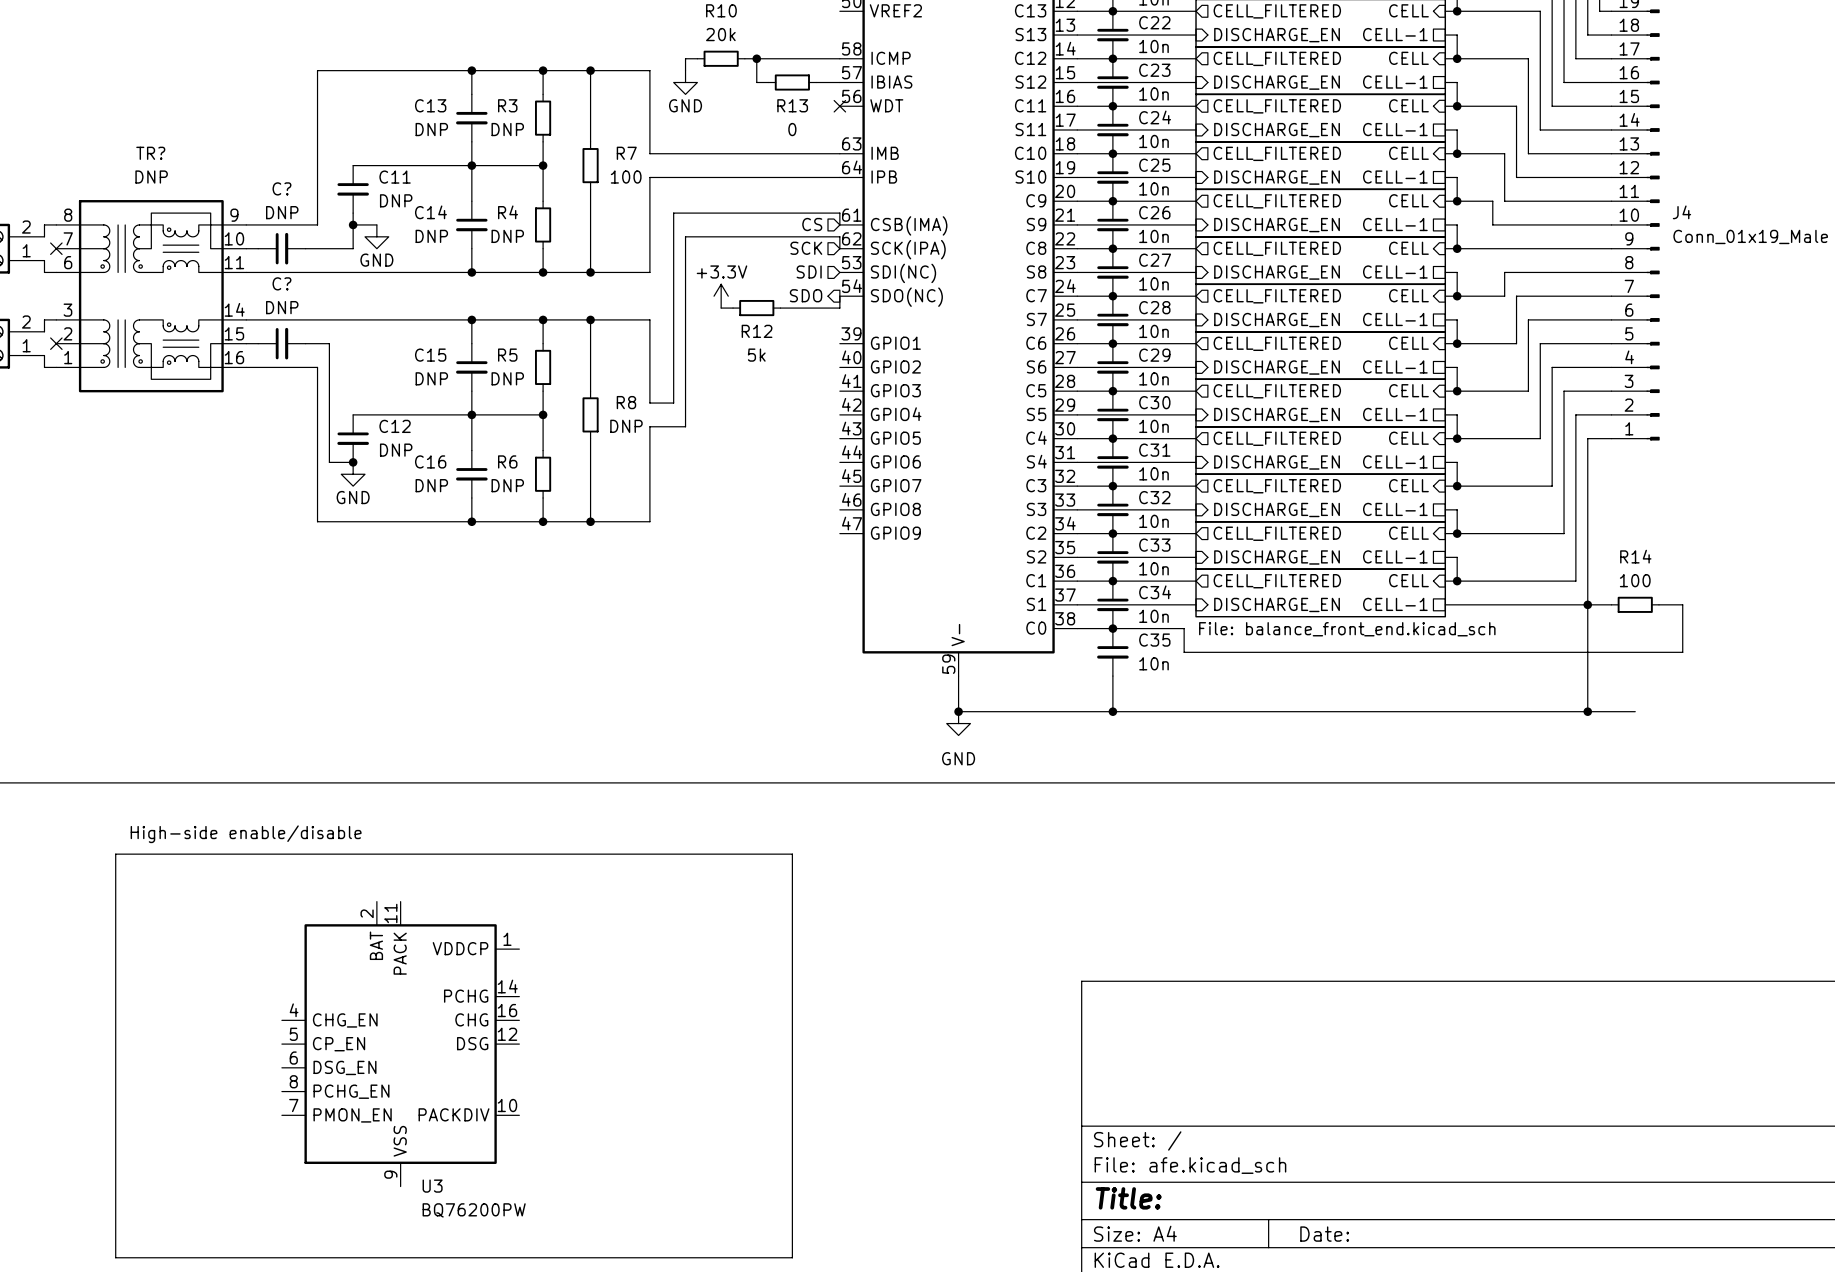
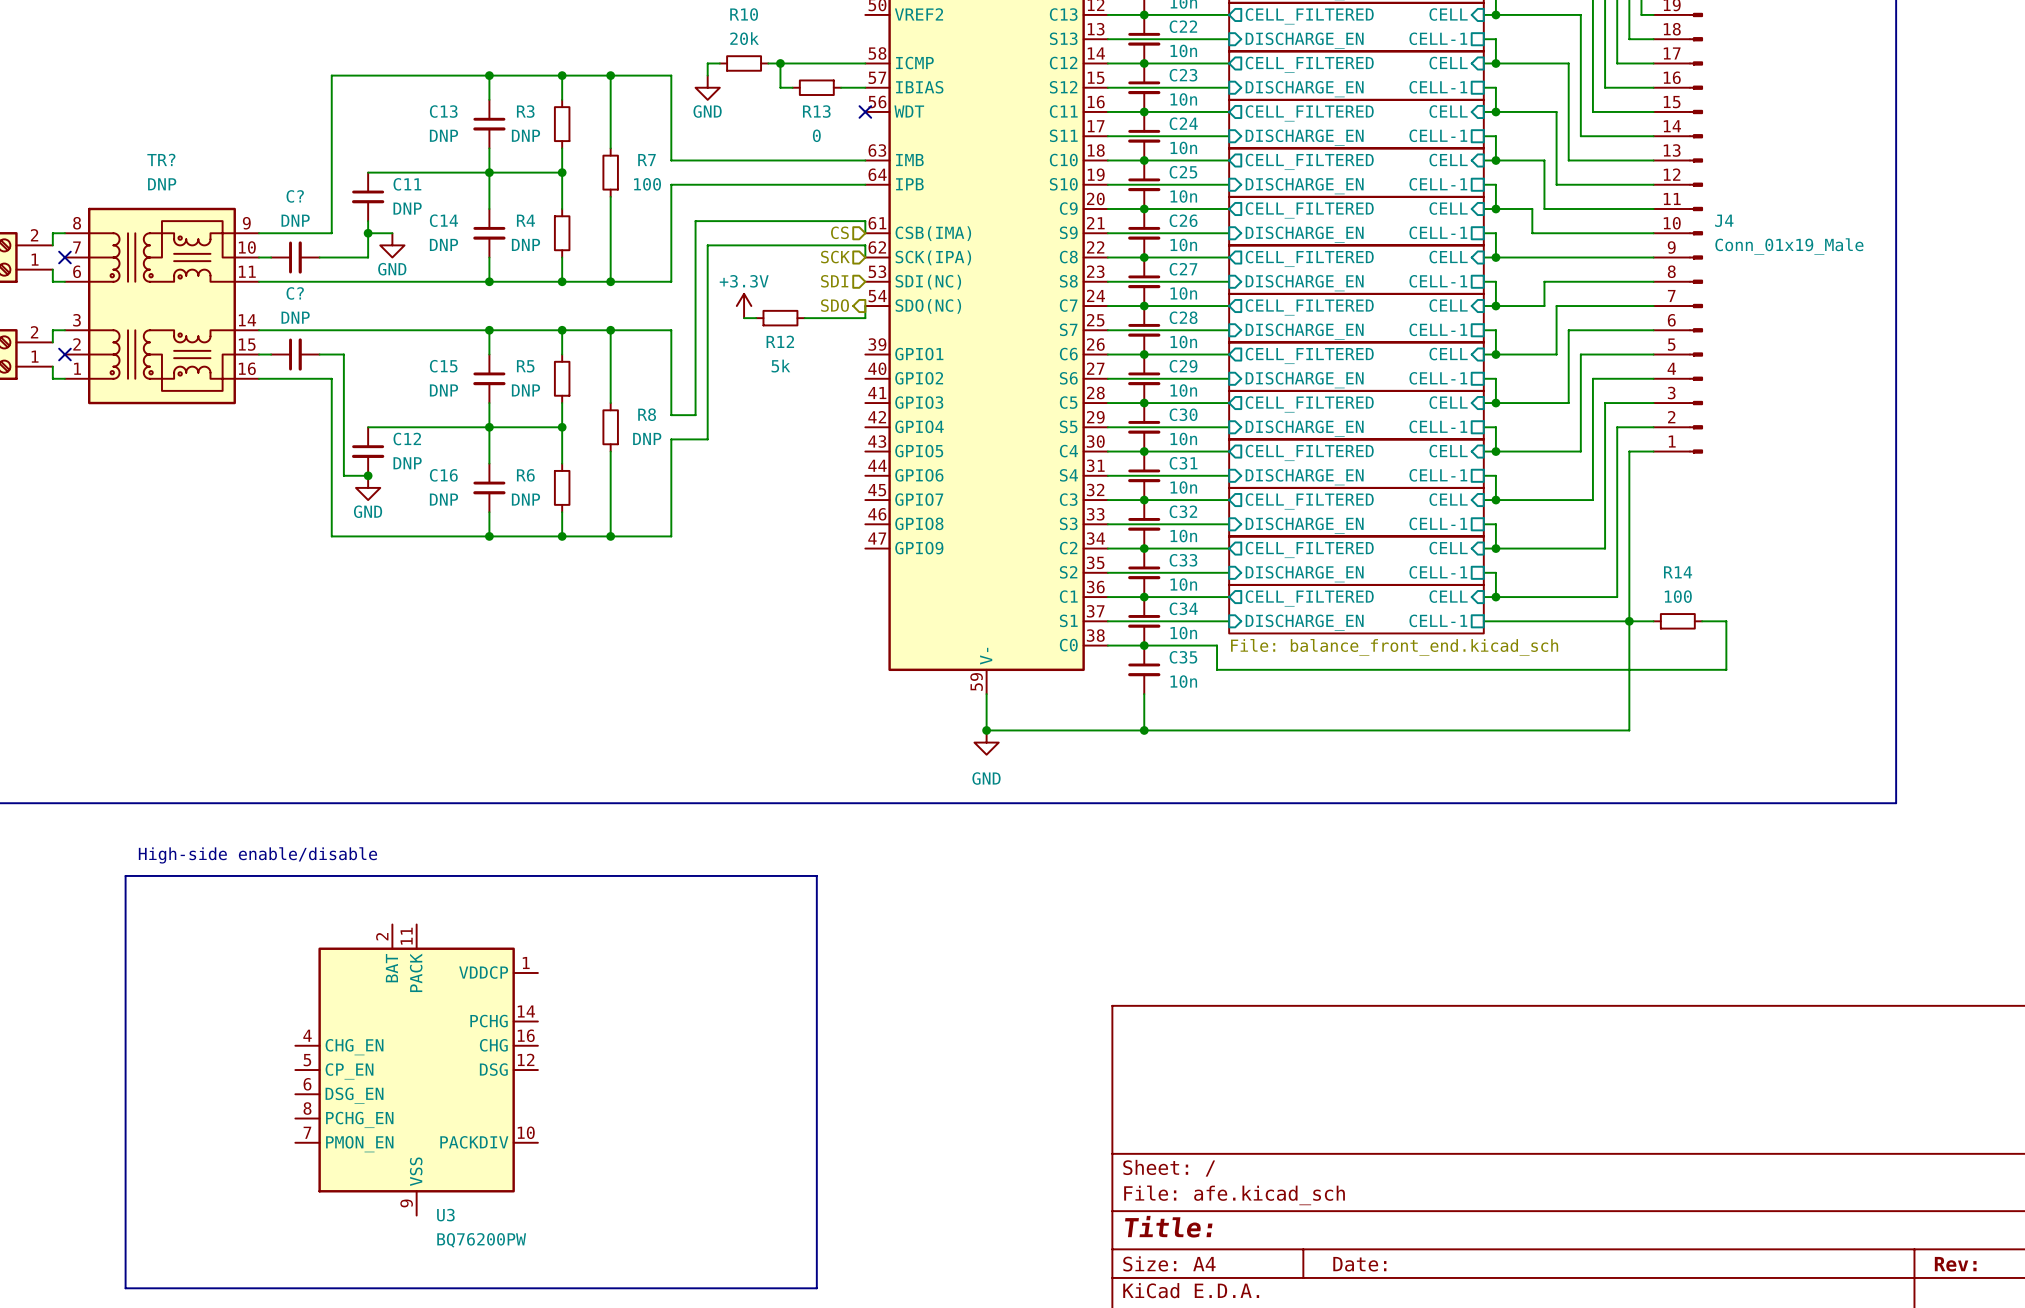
wire: (1587, 711) (1635, 711) -> none
junction: (1587, 711) -> none

